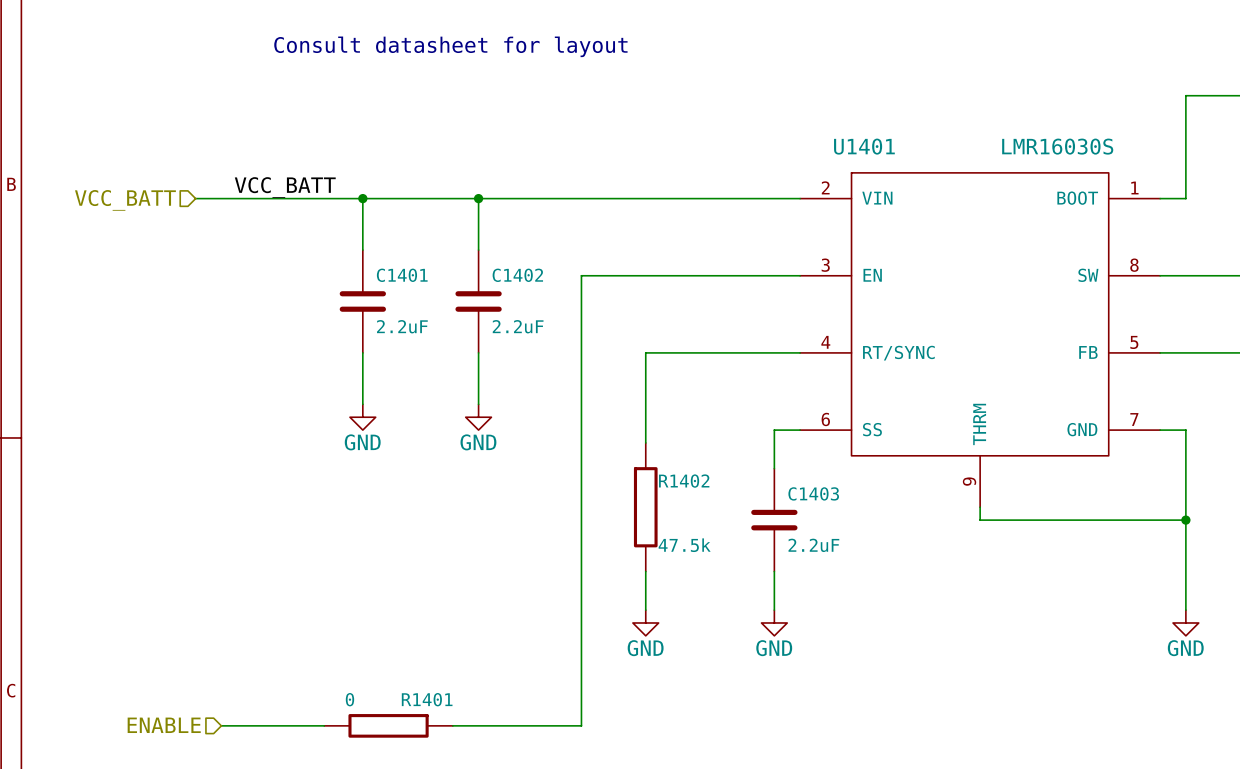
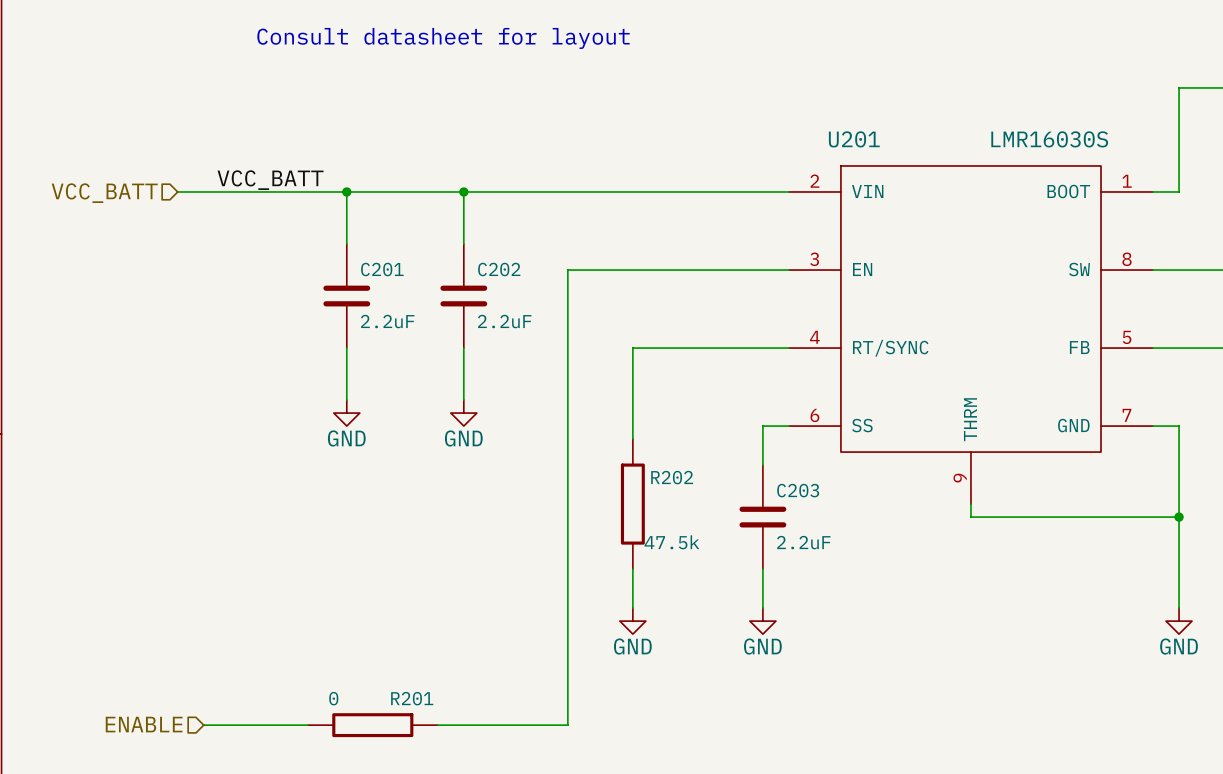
U1401 name: U1401 (864, 146) -> U201 (854, 139)
C1401 name: C1401 (402, 275) -> C201 (382, 269)
C1402 name: C1402 (517, 275) -> C202 (499, 269)
R1402 name: R1402 (684, 481) -> R202 (672, 477)
C1403 name: C1403 (813, 493) -> C203 (798, 490)
R1401 name: R1401 (427, 699) -> R201 (412, 698)

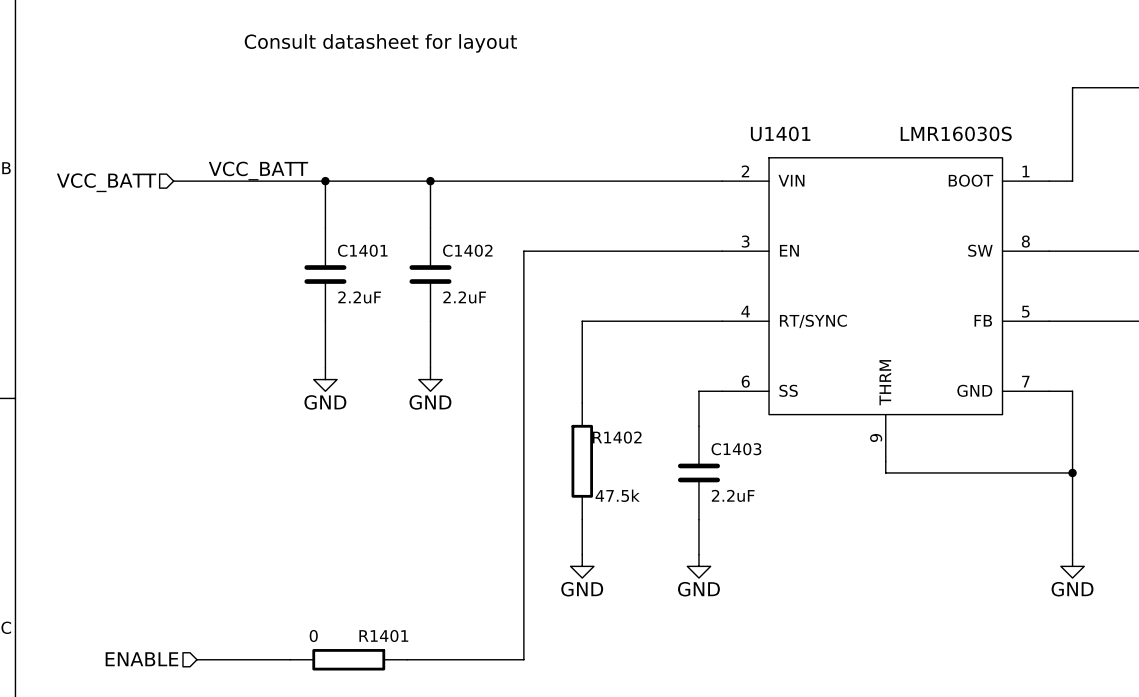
U201 name: U201 (854, 139) -> U1401 (780, 133)
C201 name: C201 (382, 269) -> C1401 (362, 250)
C202 name: C202 (499, 269) -> C1402 (467, 250)
R202 name: R202 (672, 477) -> R1402 (617, 437)
C203 name: C203 (798, 490) -> C1403 (736, 449)
R201 name: R201 (412, 698) -> R1401 (383, 635)

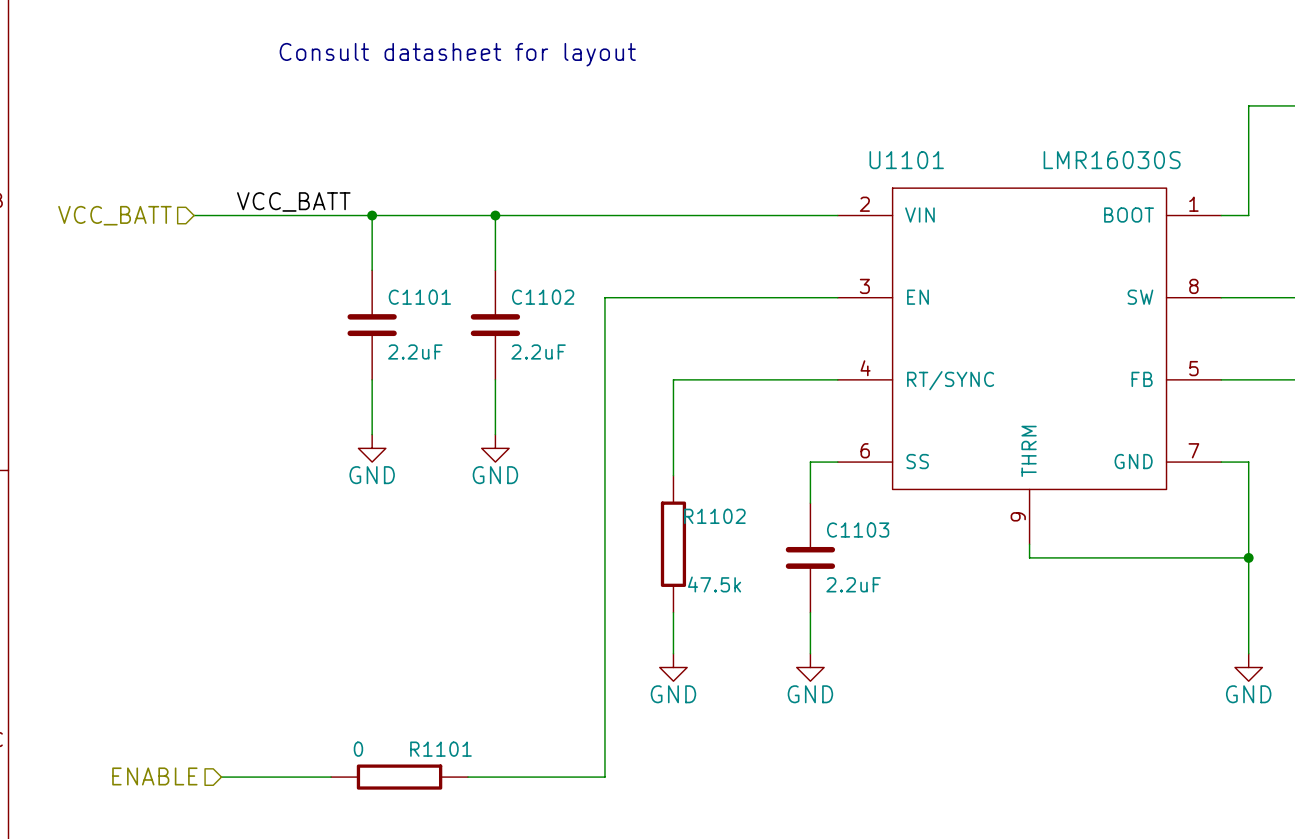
U1401 name: U1401 (780, 133) -> U1101 (906, 160)
C1401 name: C1401 (362, 250) -> C1101 (419, 297)
C1402 name: C1402 (467, 250) -> C1102 (543, 297)
R1402 name: R1402 (617, 437) -> R1102 (714, 516)
C1403 name: C1403 (736, 449) -> C1103 (858, 530)
R1401 name: R1401 (383, 635) -> R1101 (440, 749)

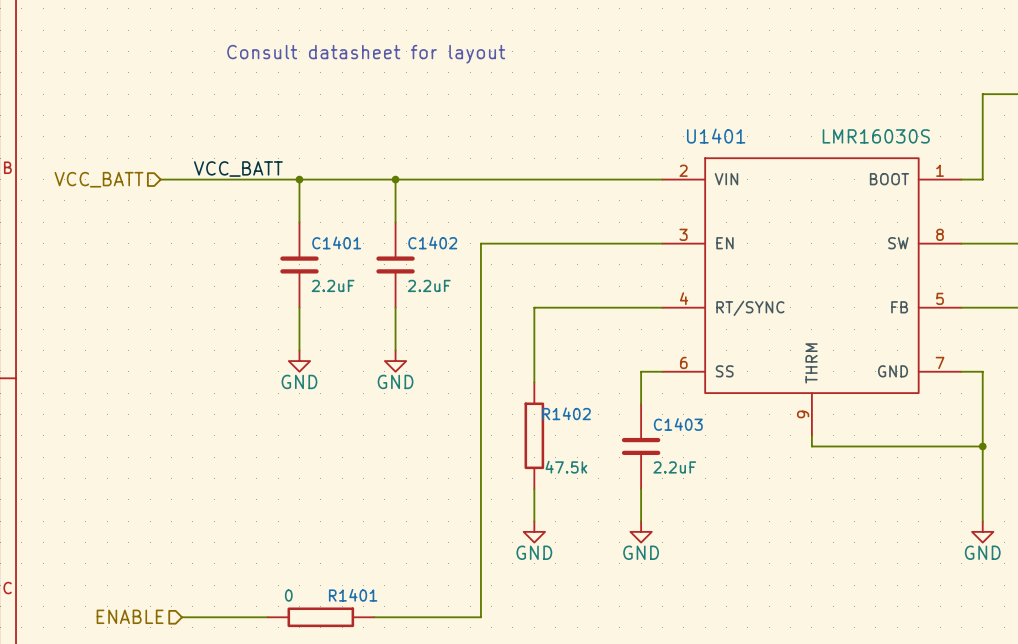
U1101 name: U1101 (906, 160) -> U1401 (716, 136)
C1101 name: C1101 (419, 297) -> C1401 (336, 242)
C1102 name: C1102 (543, 297) -> C1402 (432, 242)
R1102 name: R1102 (714, 516) -> R1402 (566, 413)
C1103 name: C1103 (858, 530) -> C1403 (678, 424)
R1101 name: R1101 (440, 749) -> R1401 (353, 595)

